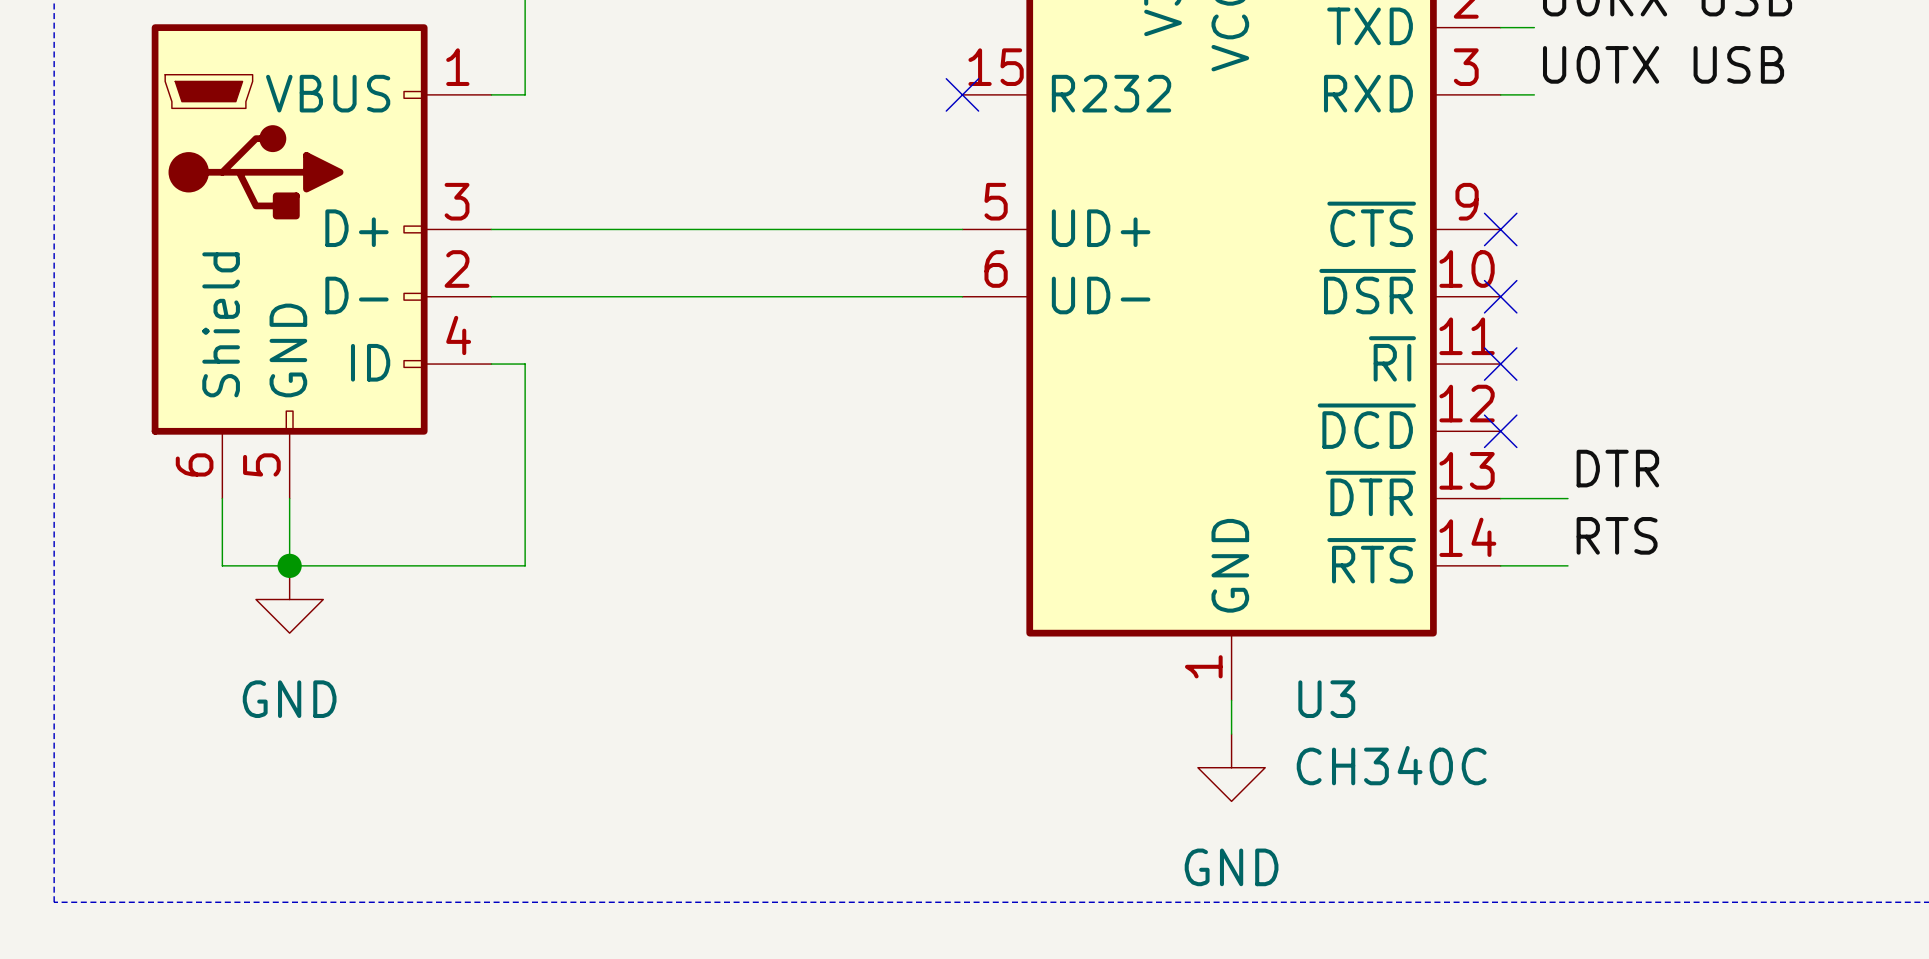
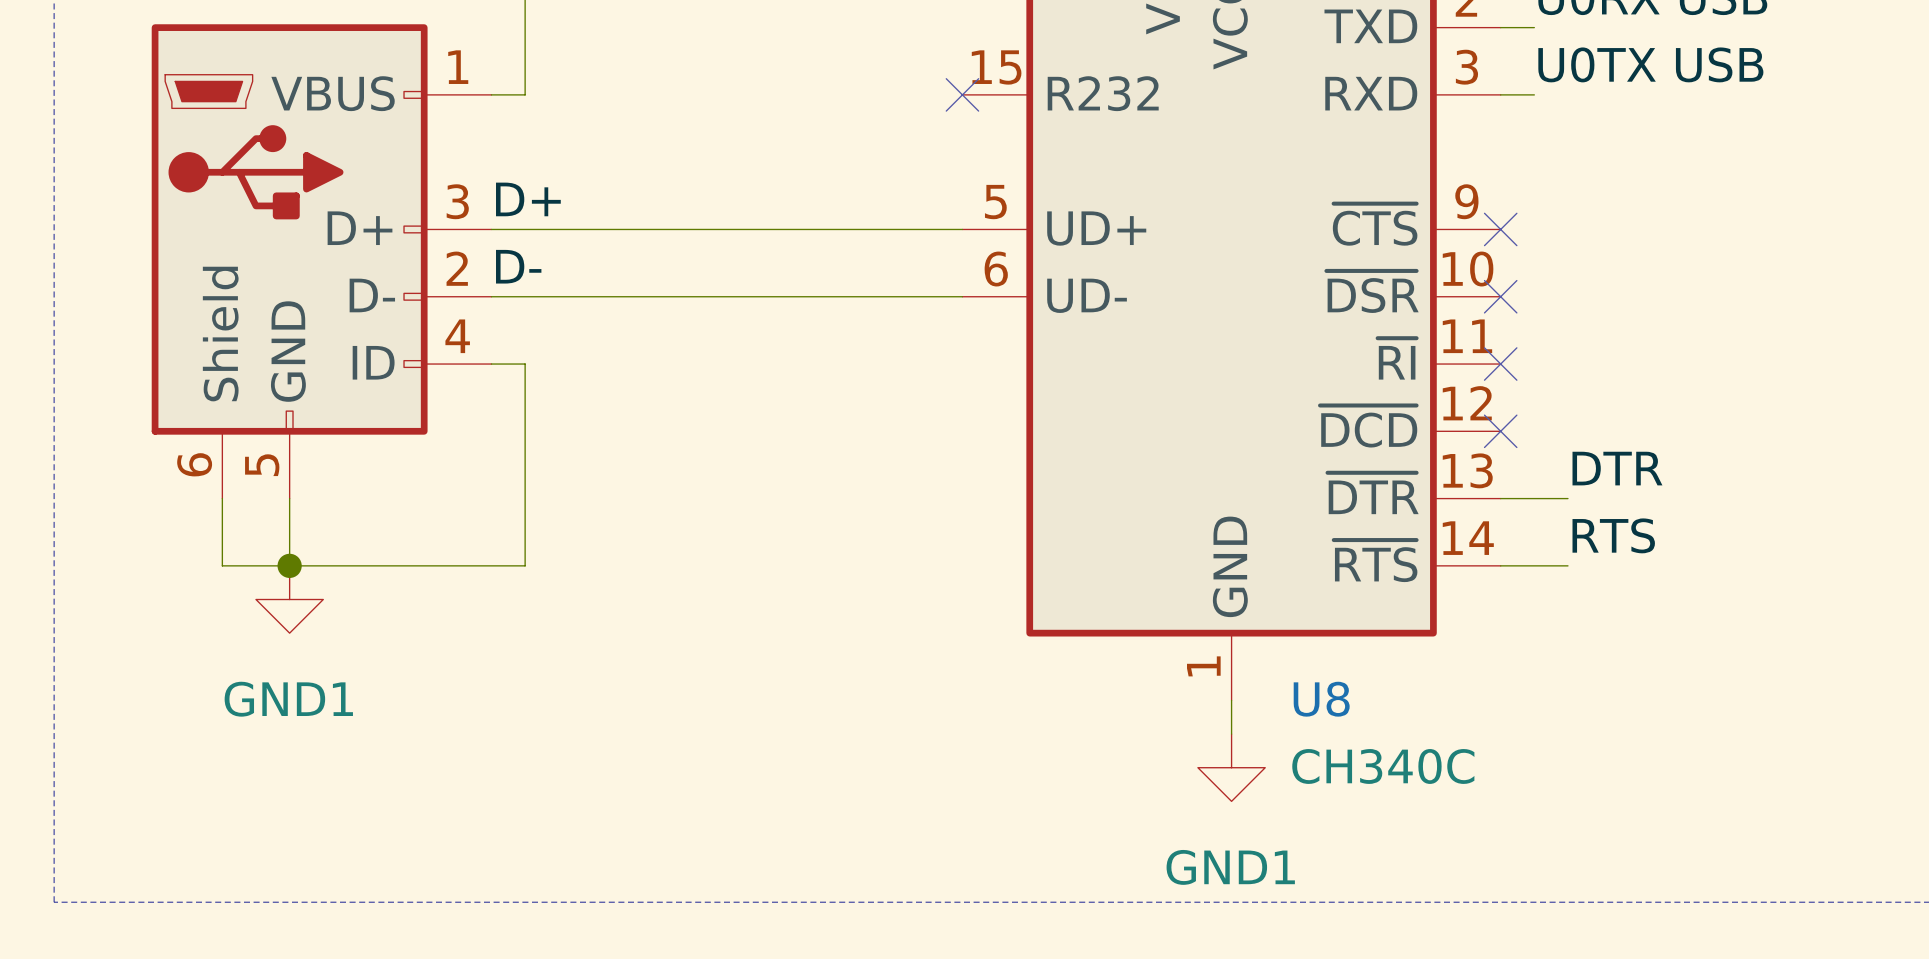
label: none -> D+ (528, 199)
label: none -> D- (518, 266)
power symbol: GND (289, 599) -> GND1 (289, 599)
U3 name: U3 (1326, 699) -> U8 (1321, 699)
power symbol: GND (1231, 767) -> GND1 (1231, 767)

